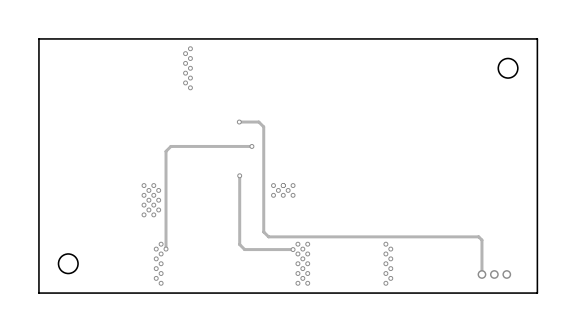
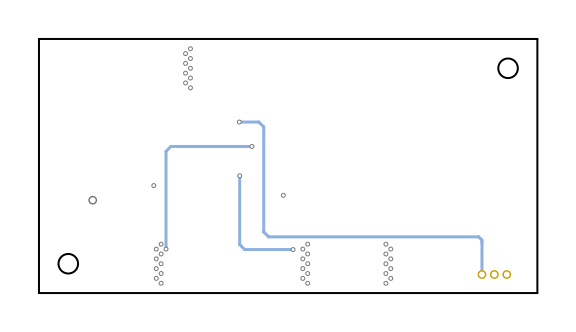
via: (144, 185) -> none
via: (273, 185) -> none
via: (283, 185) -> none
via: (293, 185) -> none
via: (148, 190) -> none
via: (158, 190) -> none
via: (278, 190) -> none
via: (288, 190) -> none
via: (144, 195) -> none
via: (153, 195) -> none
via: (273, 195) -> none
via: (293, 195) -> none
via: none -> (92, 200)
via: (148, 200) -> none
via: (158, 200) -> none
via: (144, 205) -> none
via: (153, 205) -> none
via: (148, 209) -> none
via: (158, 209) -> none
via: (144, 214) -> none
via: (153, 214) -> none
via: (297, 244) -> none
via: (297, 253) -> none
via: (297, 263) -> none
via: (297, 273) -> none
via: (297, 283) -> none

